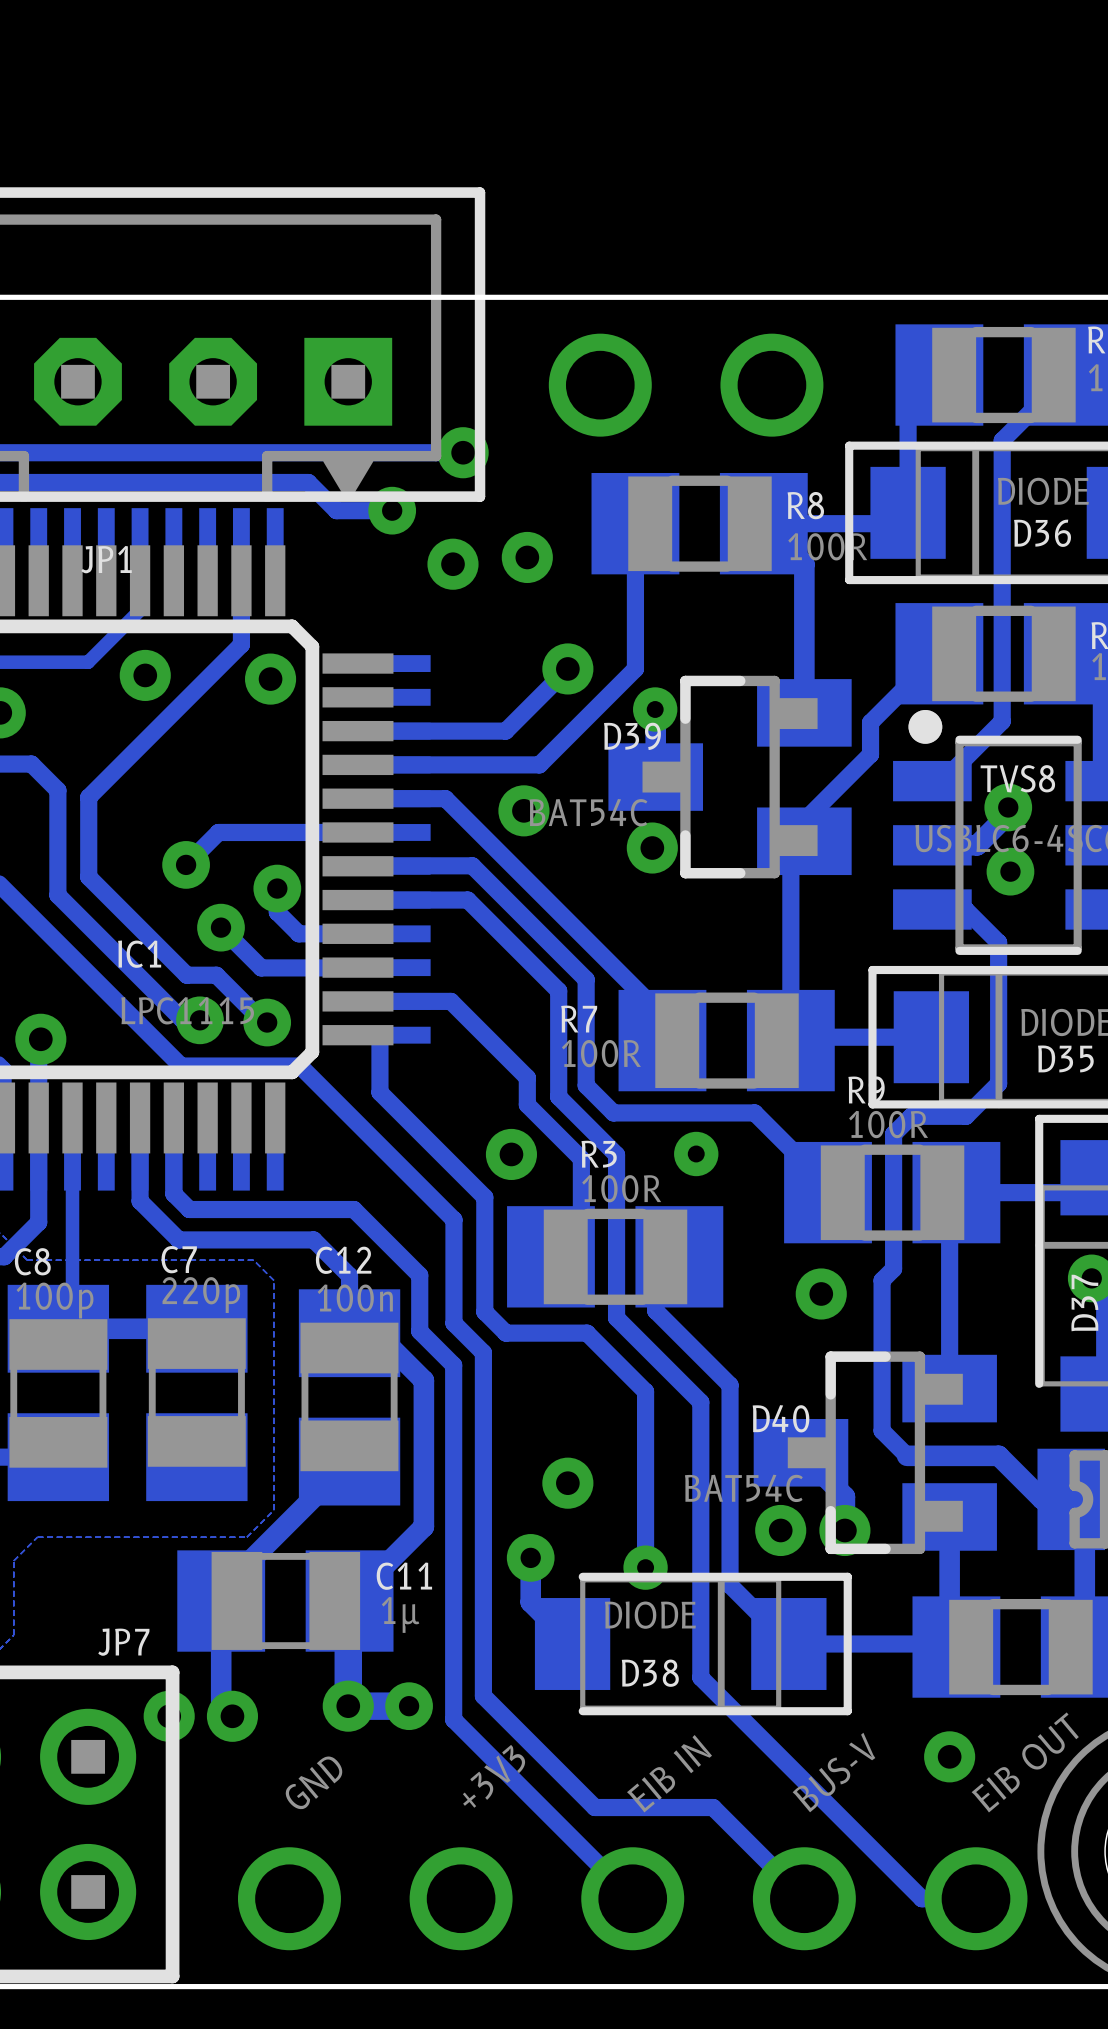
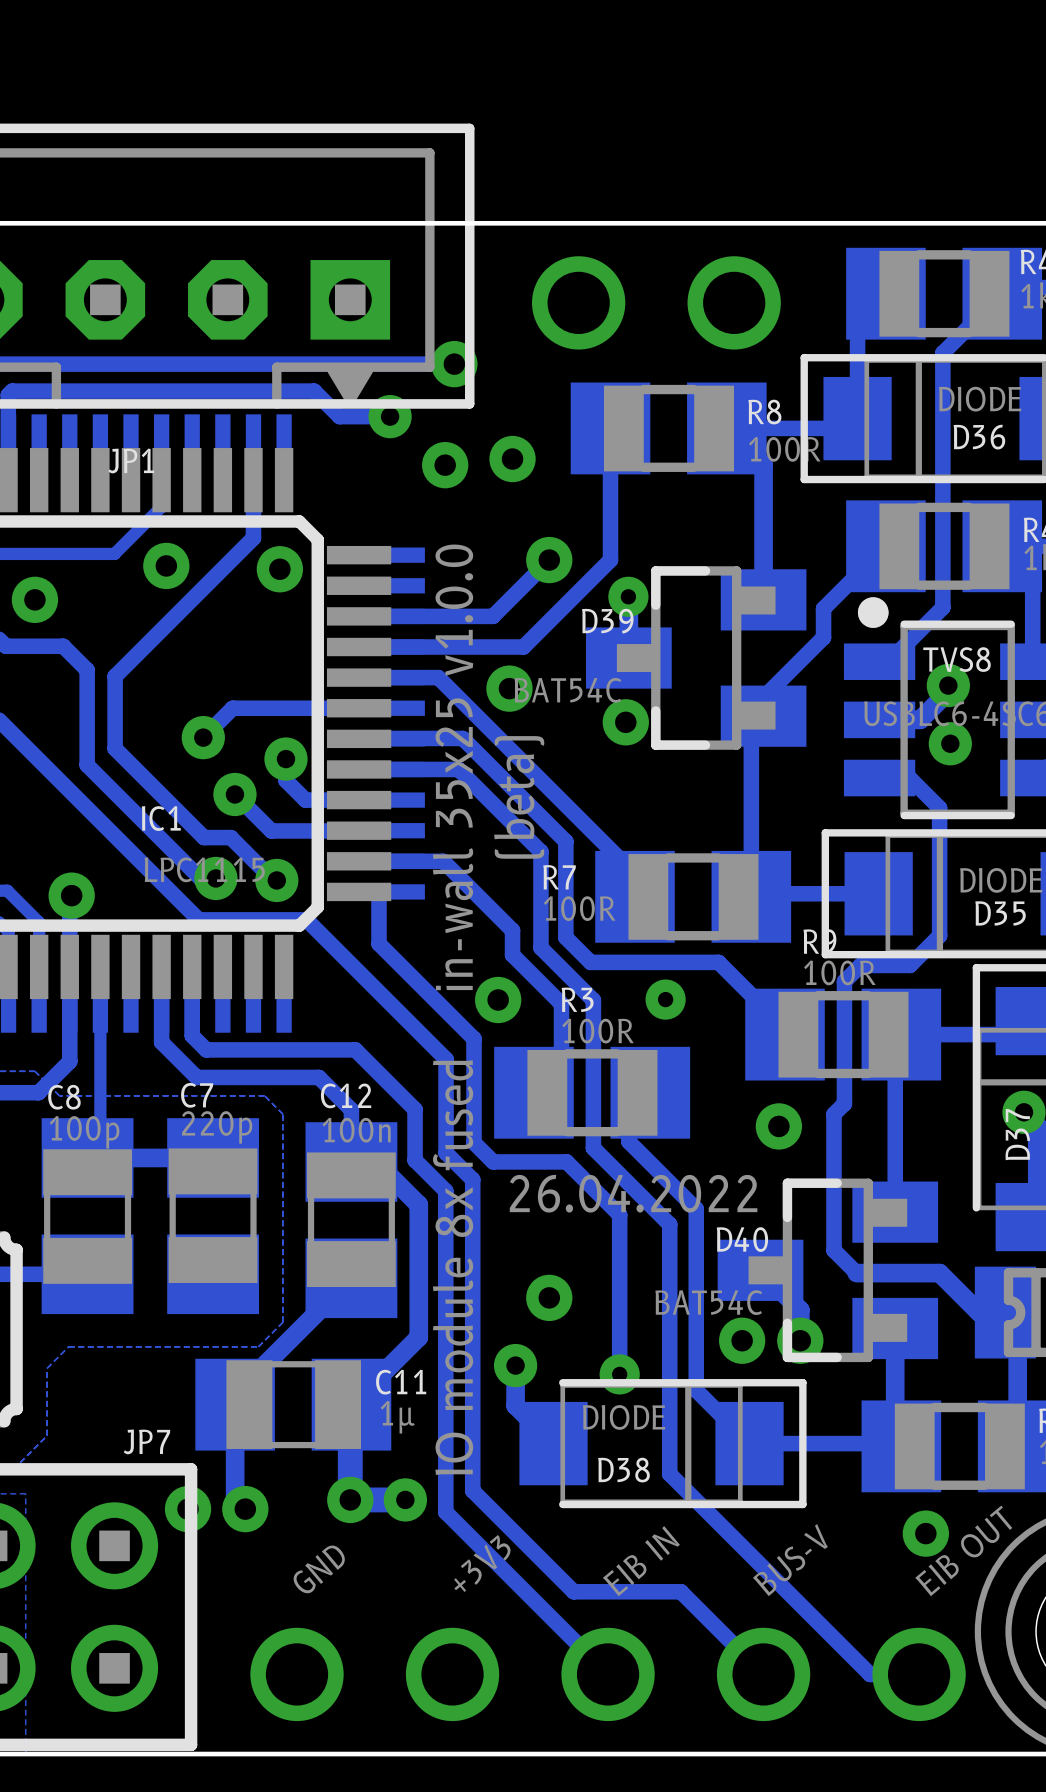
text: none -> (beta) (519, 797)
text: none -> IO module 8x fused in-wall 35x25 v1.0.0 (453, 1009)
text: none -> 26.04.2022 (633, 1193)
via position: (949, 1756) -> (925, 1533)

